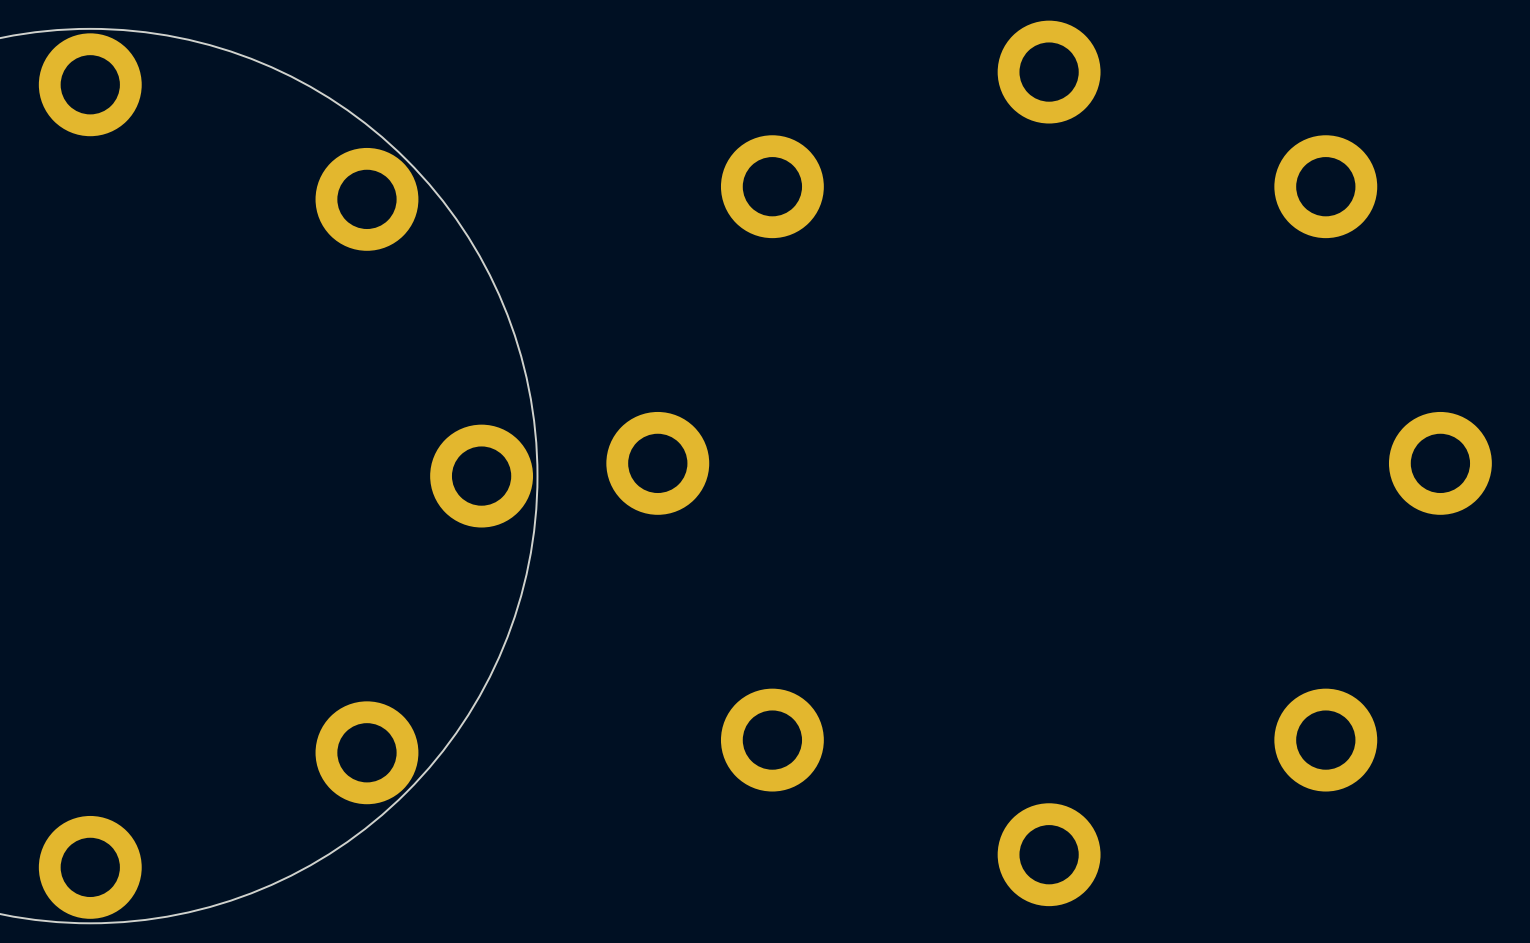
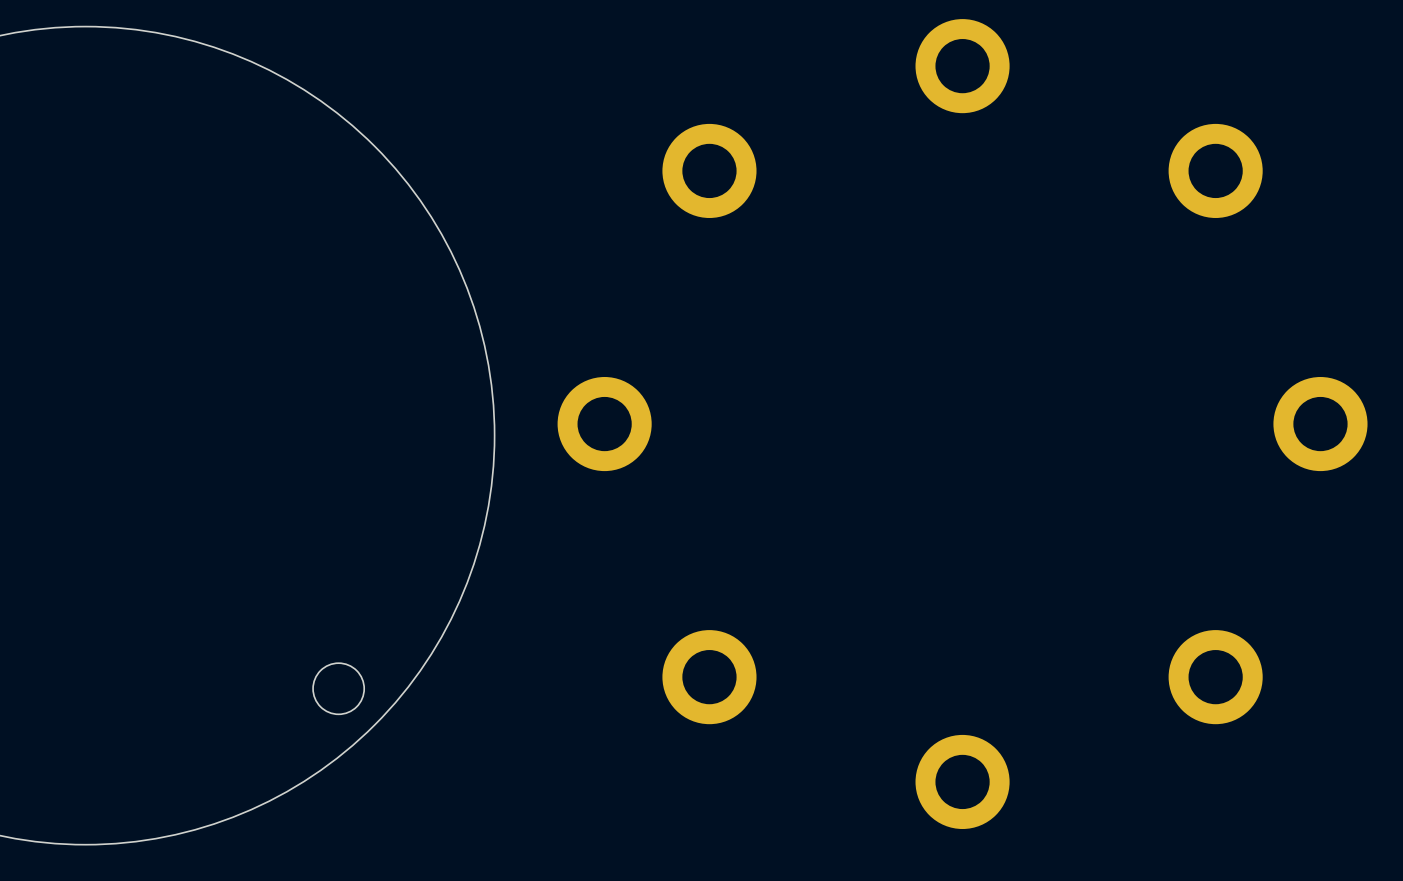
part: (90, 84) -> none
part: (366, 199) -> none
part: (481, 476) -> none
round board edge: none -> [313, 663, 365, 715]
part: (366, 752) -> none
part: (90, 867) -> none

